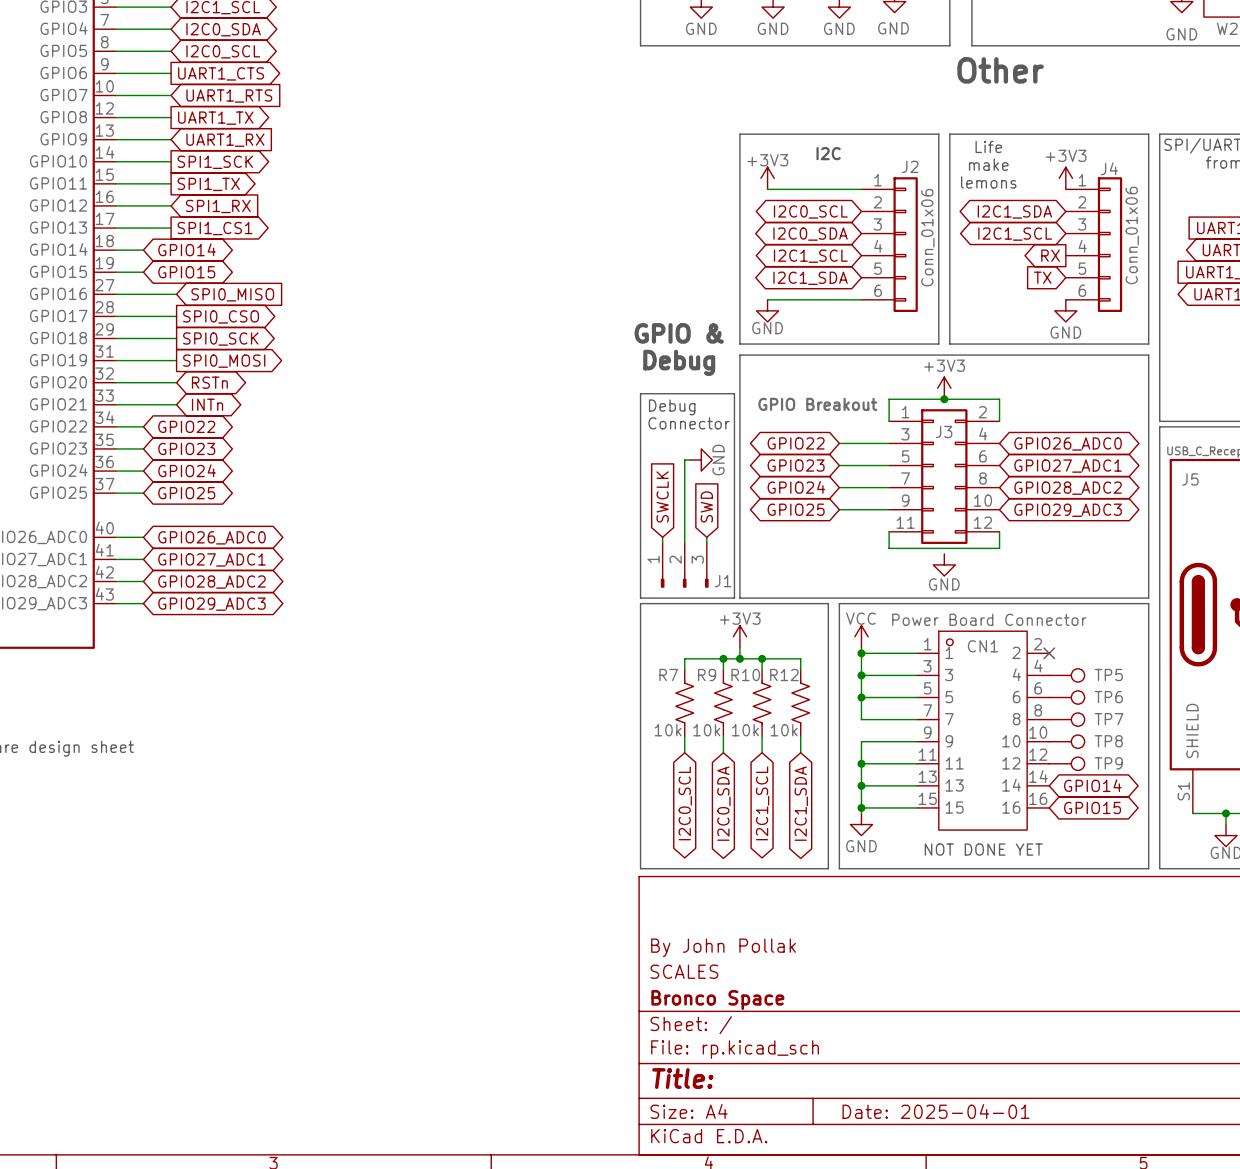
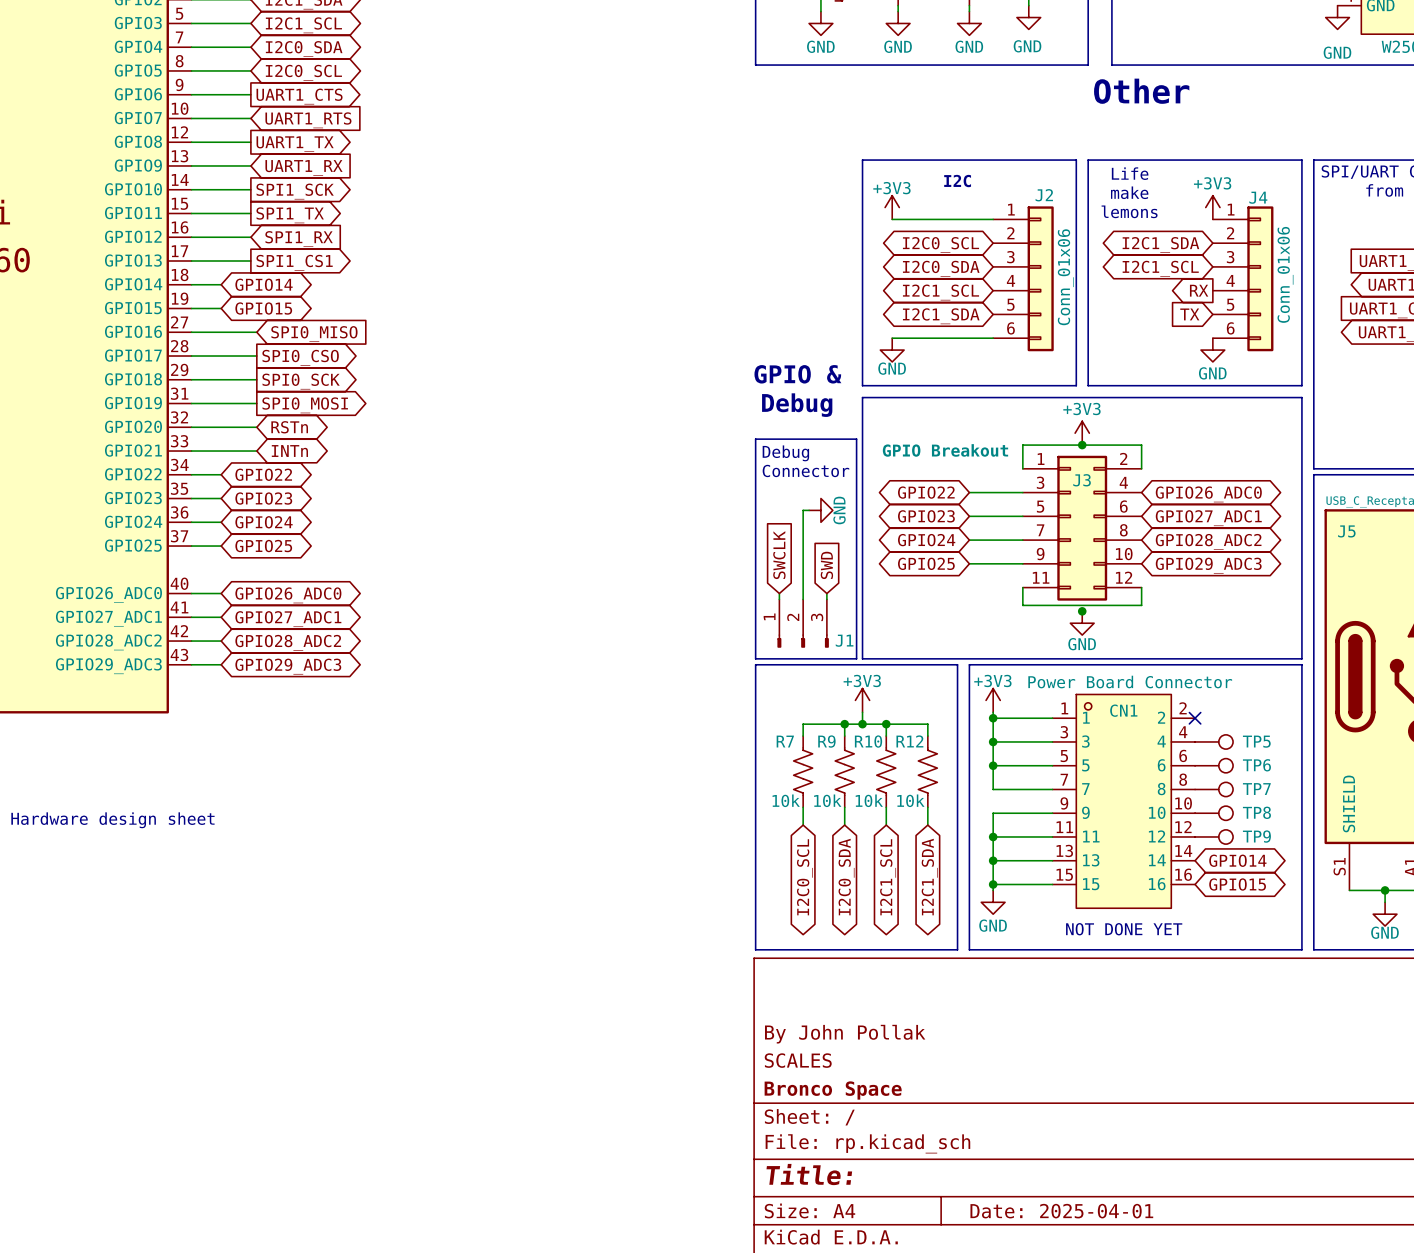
junction: none -> (1082, 611)
power symbol: VCC (861, 636) -> +3V3 (993, 700)

